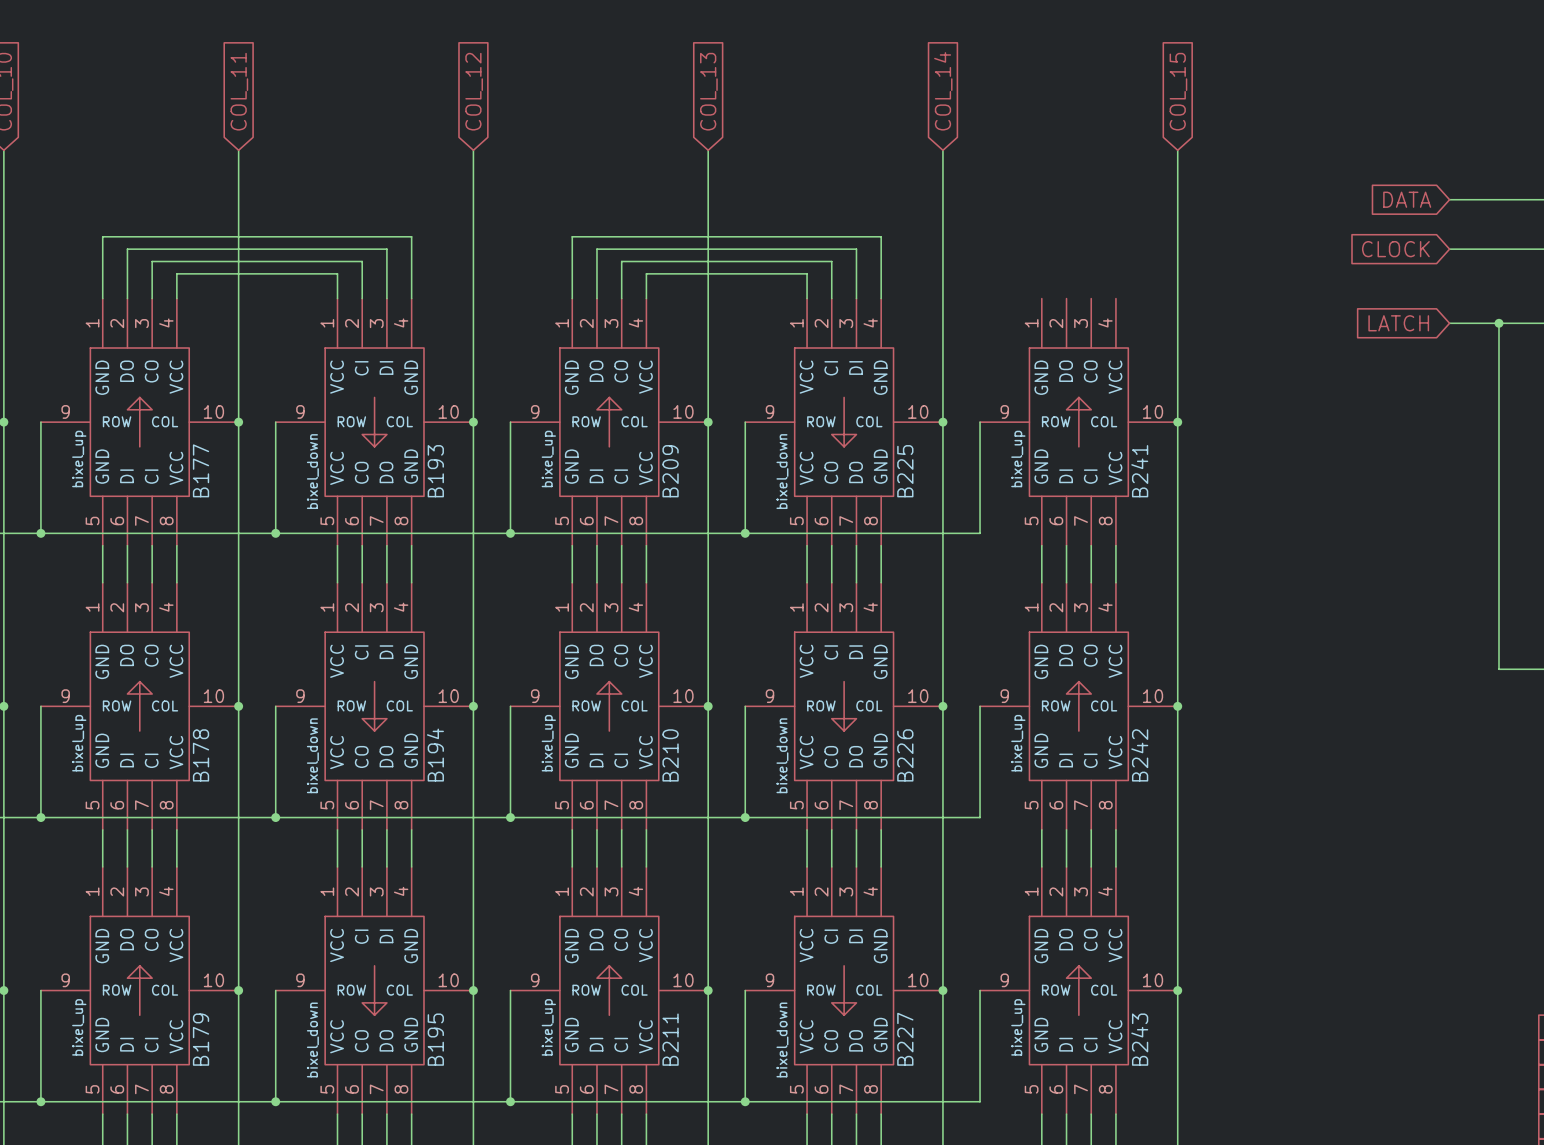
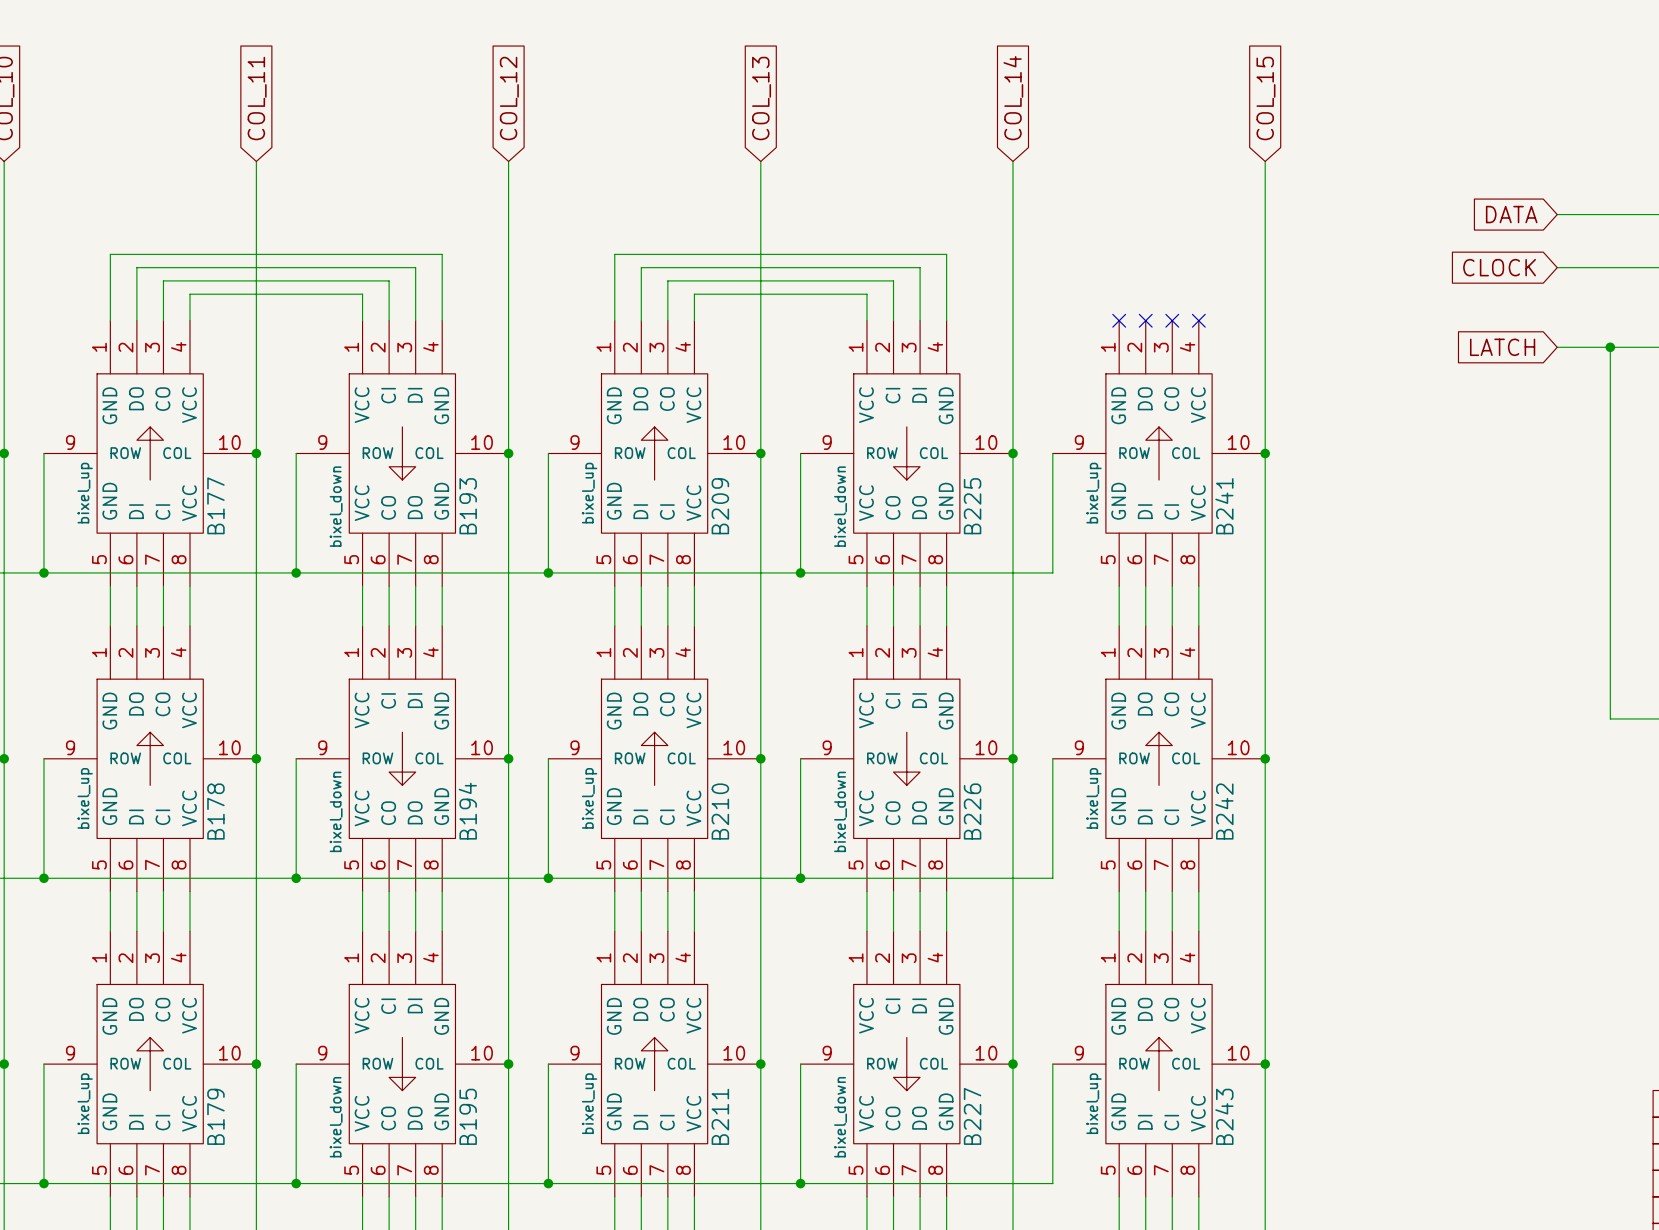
no-connect mark: none -> (1119, 320)
no-connect mark: none -> (1145, 320)
no-connect mark: none -> (1172, 320)
no-connect mark: none -> (1198, 320)

